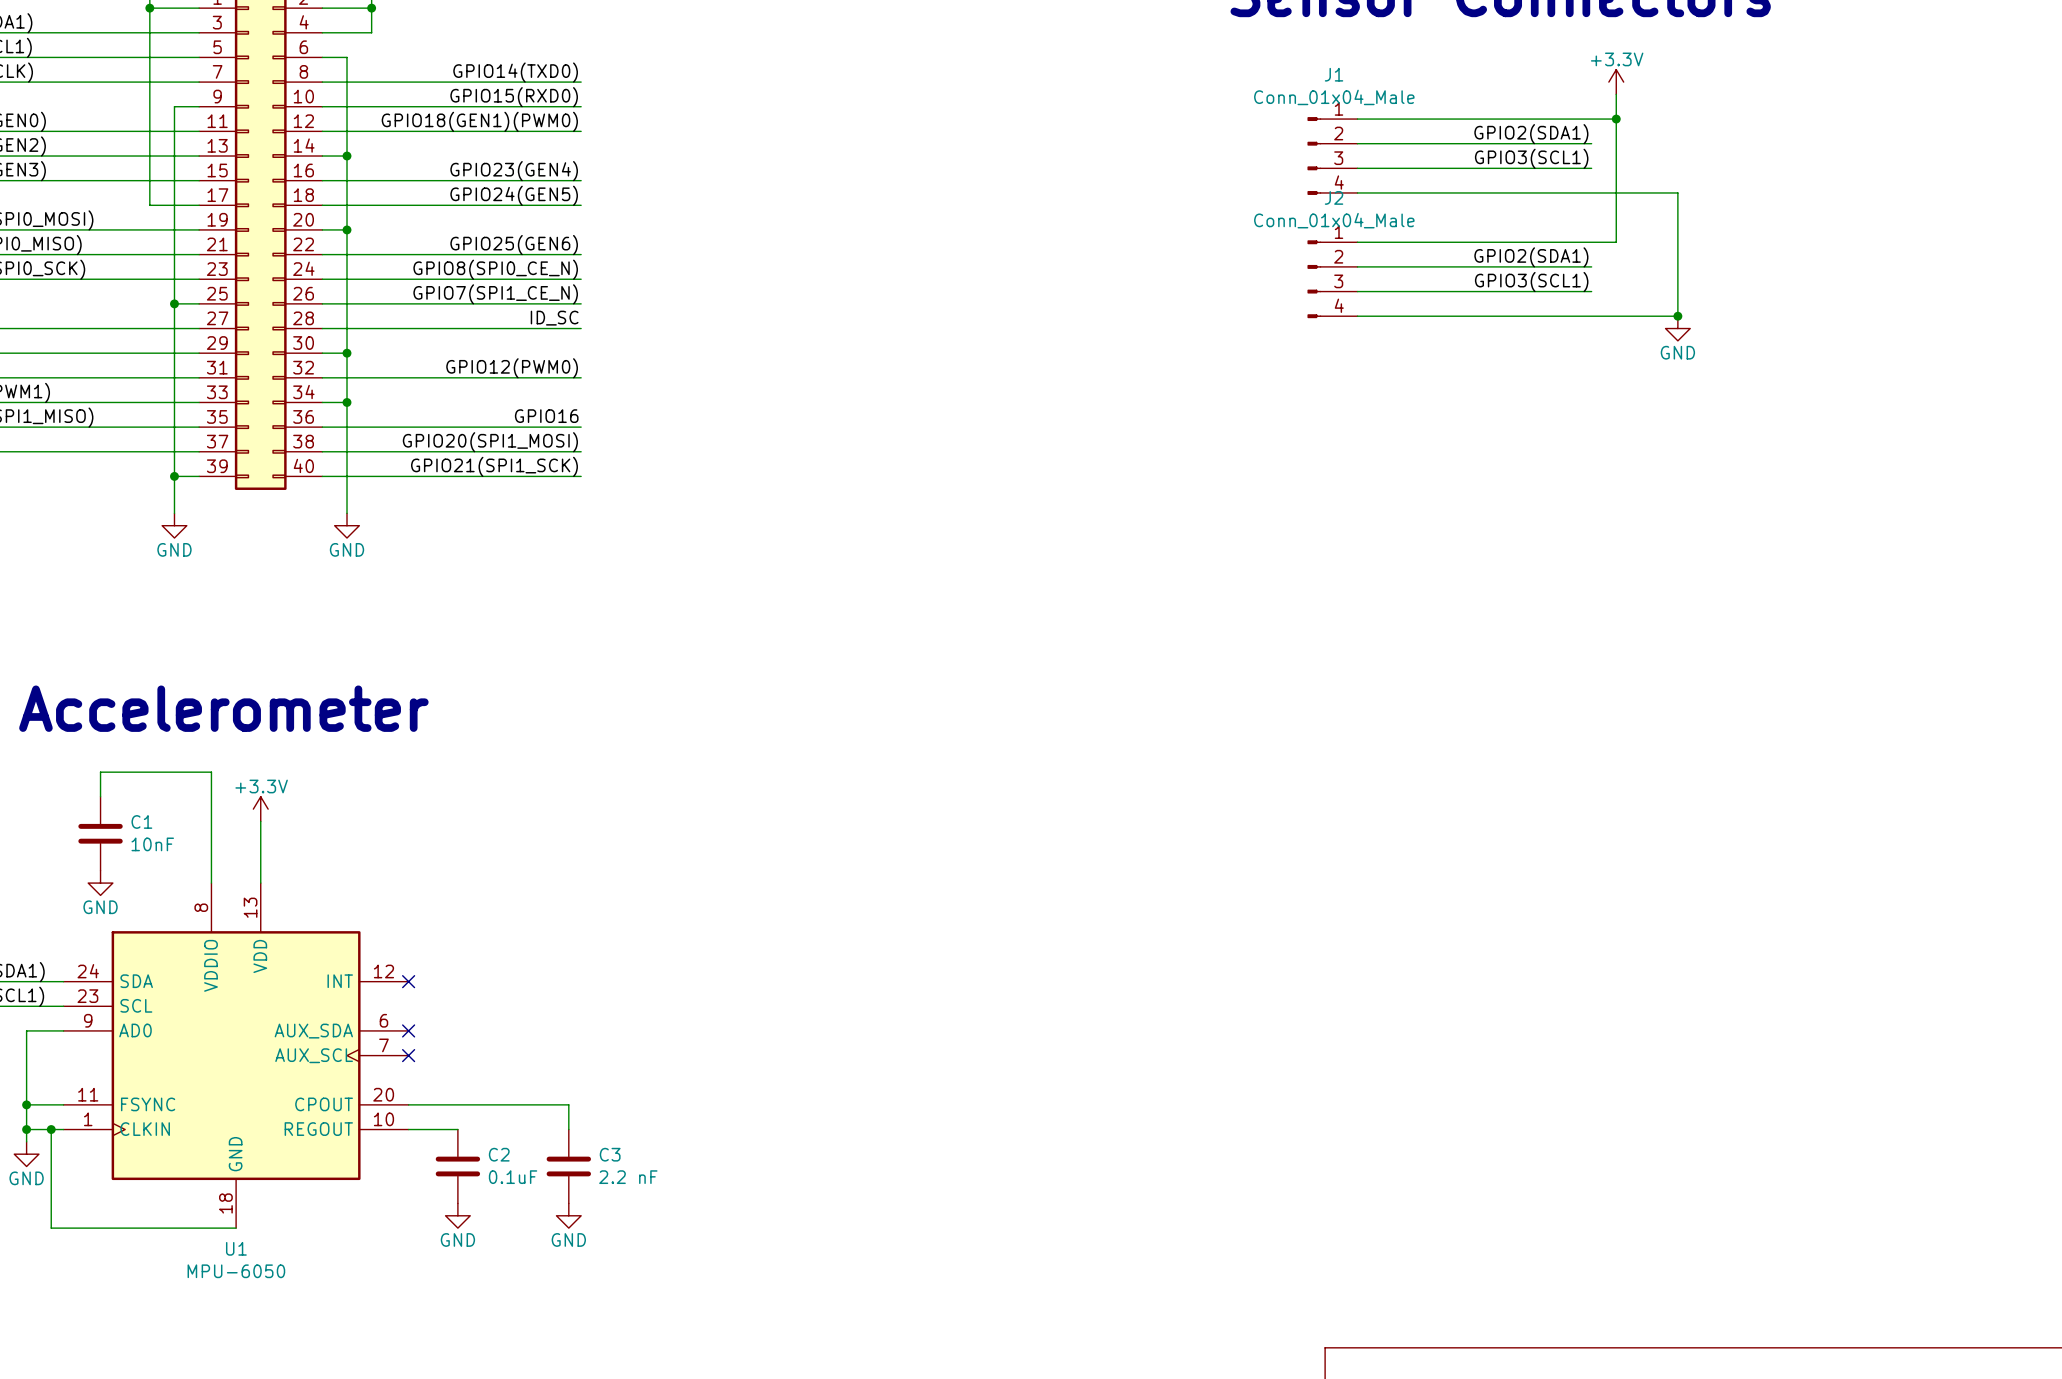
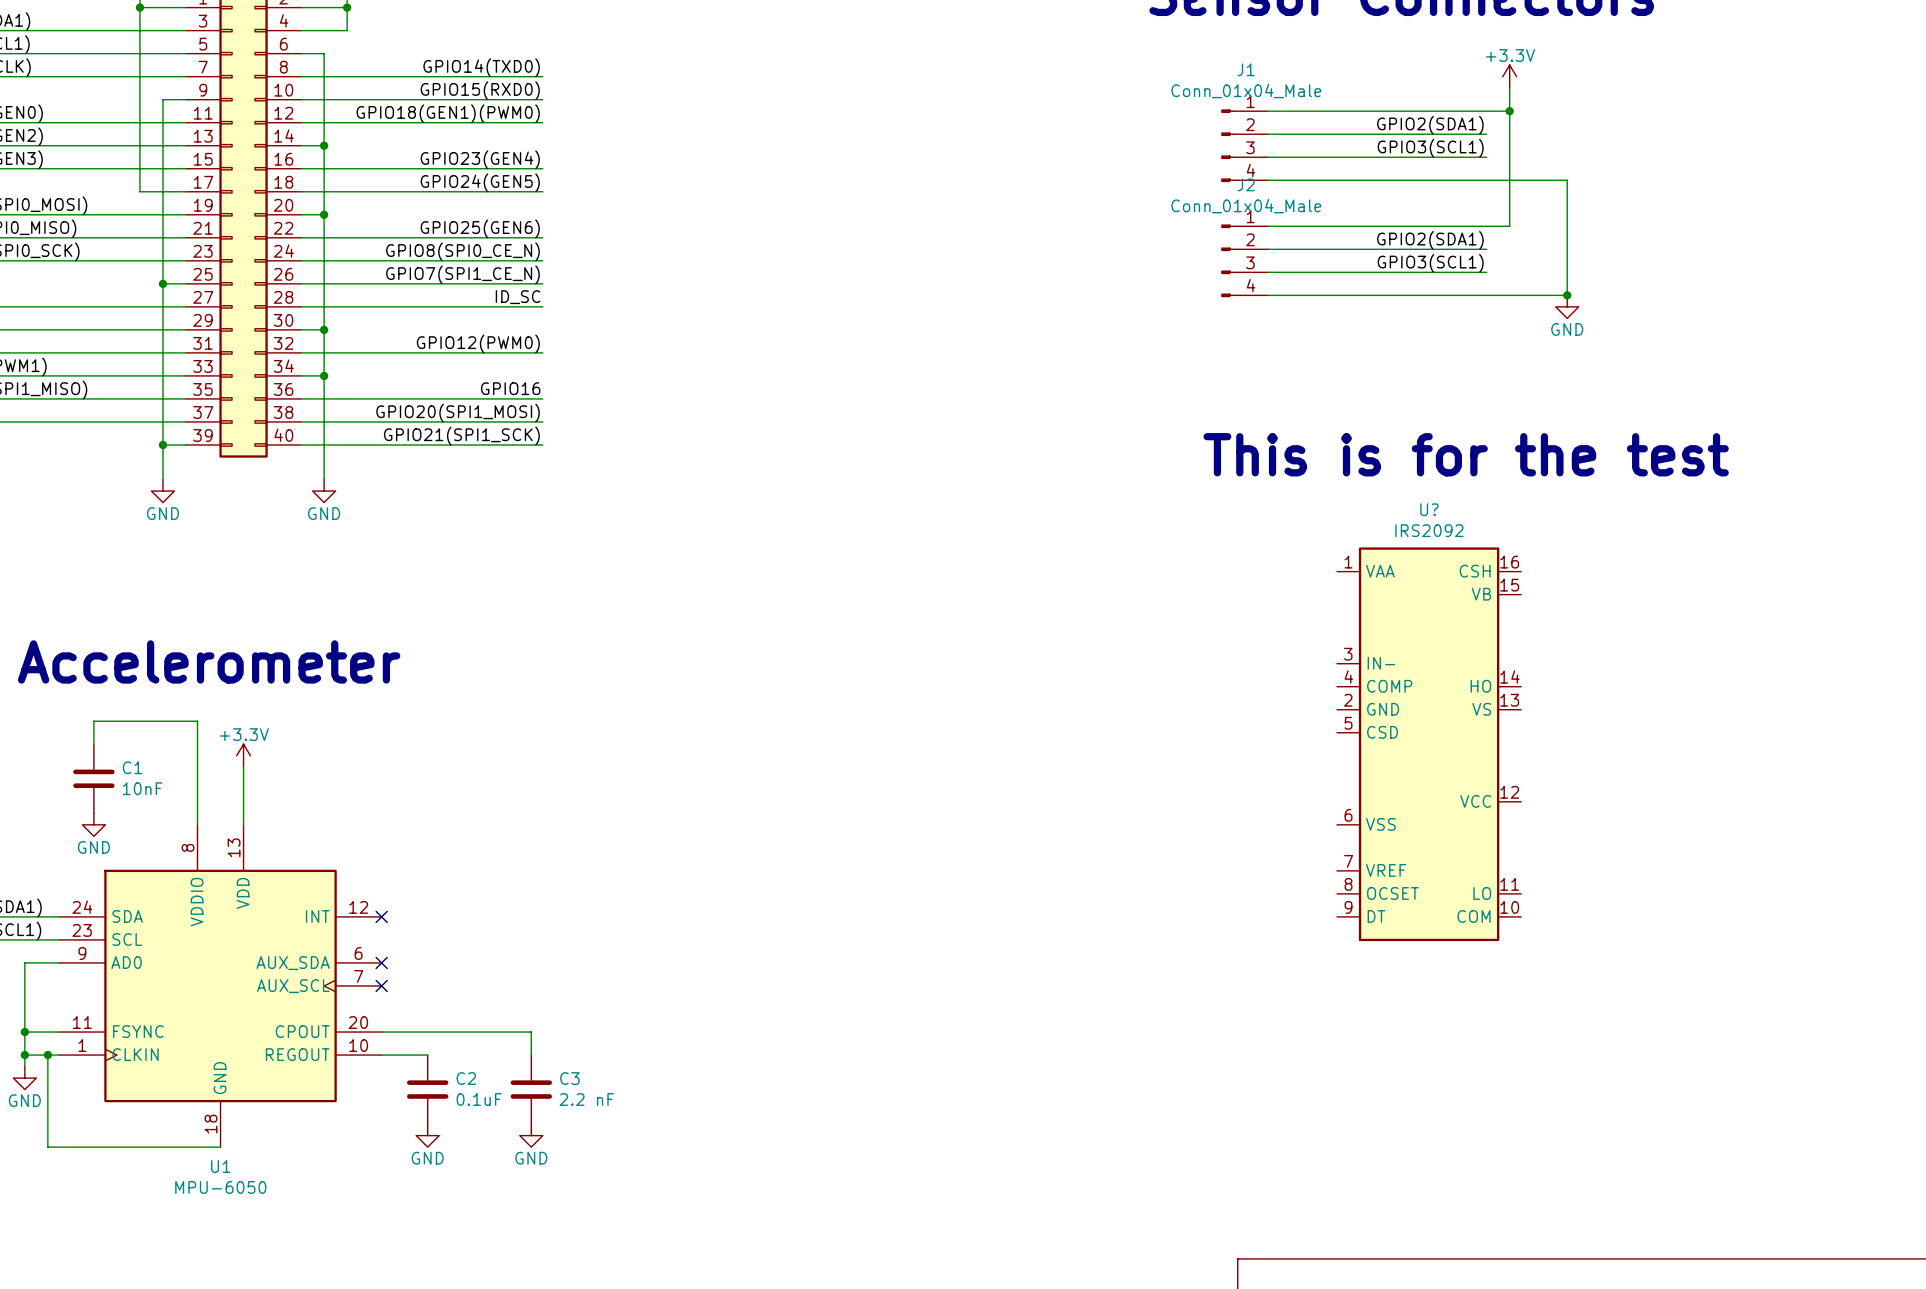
text: none -> This is for the test (1466, 454)
U?: none -> IRS2092 (1429, 744)

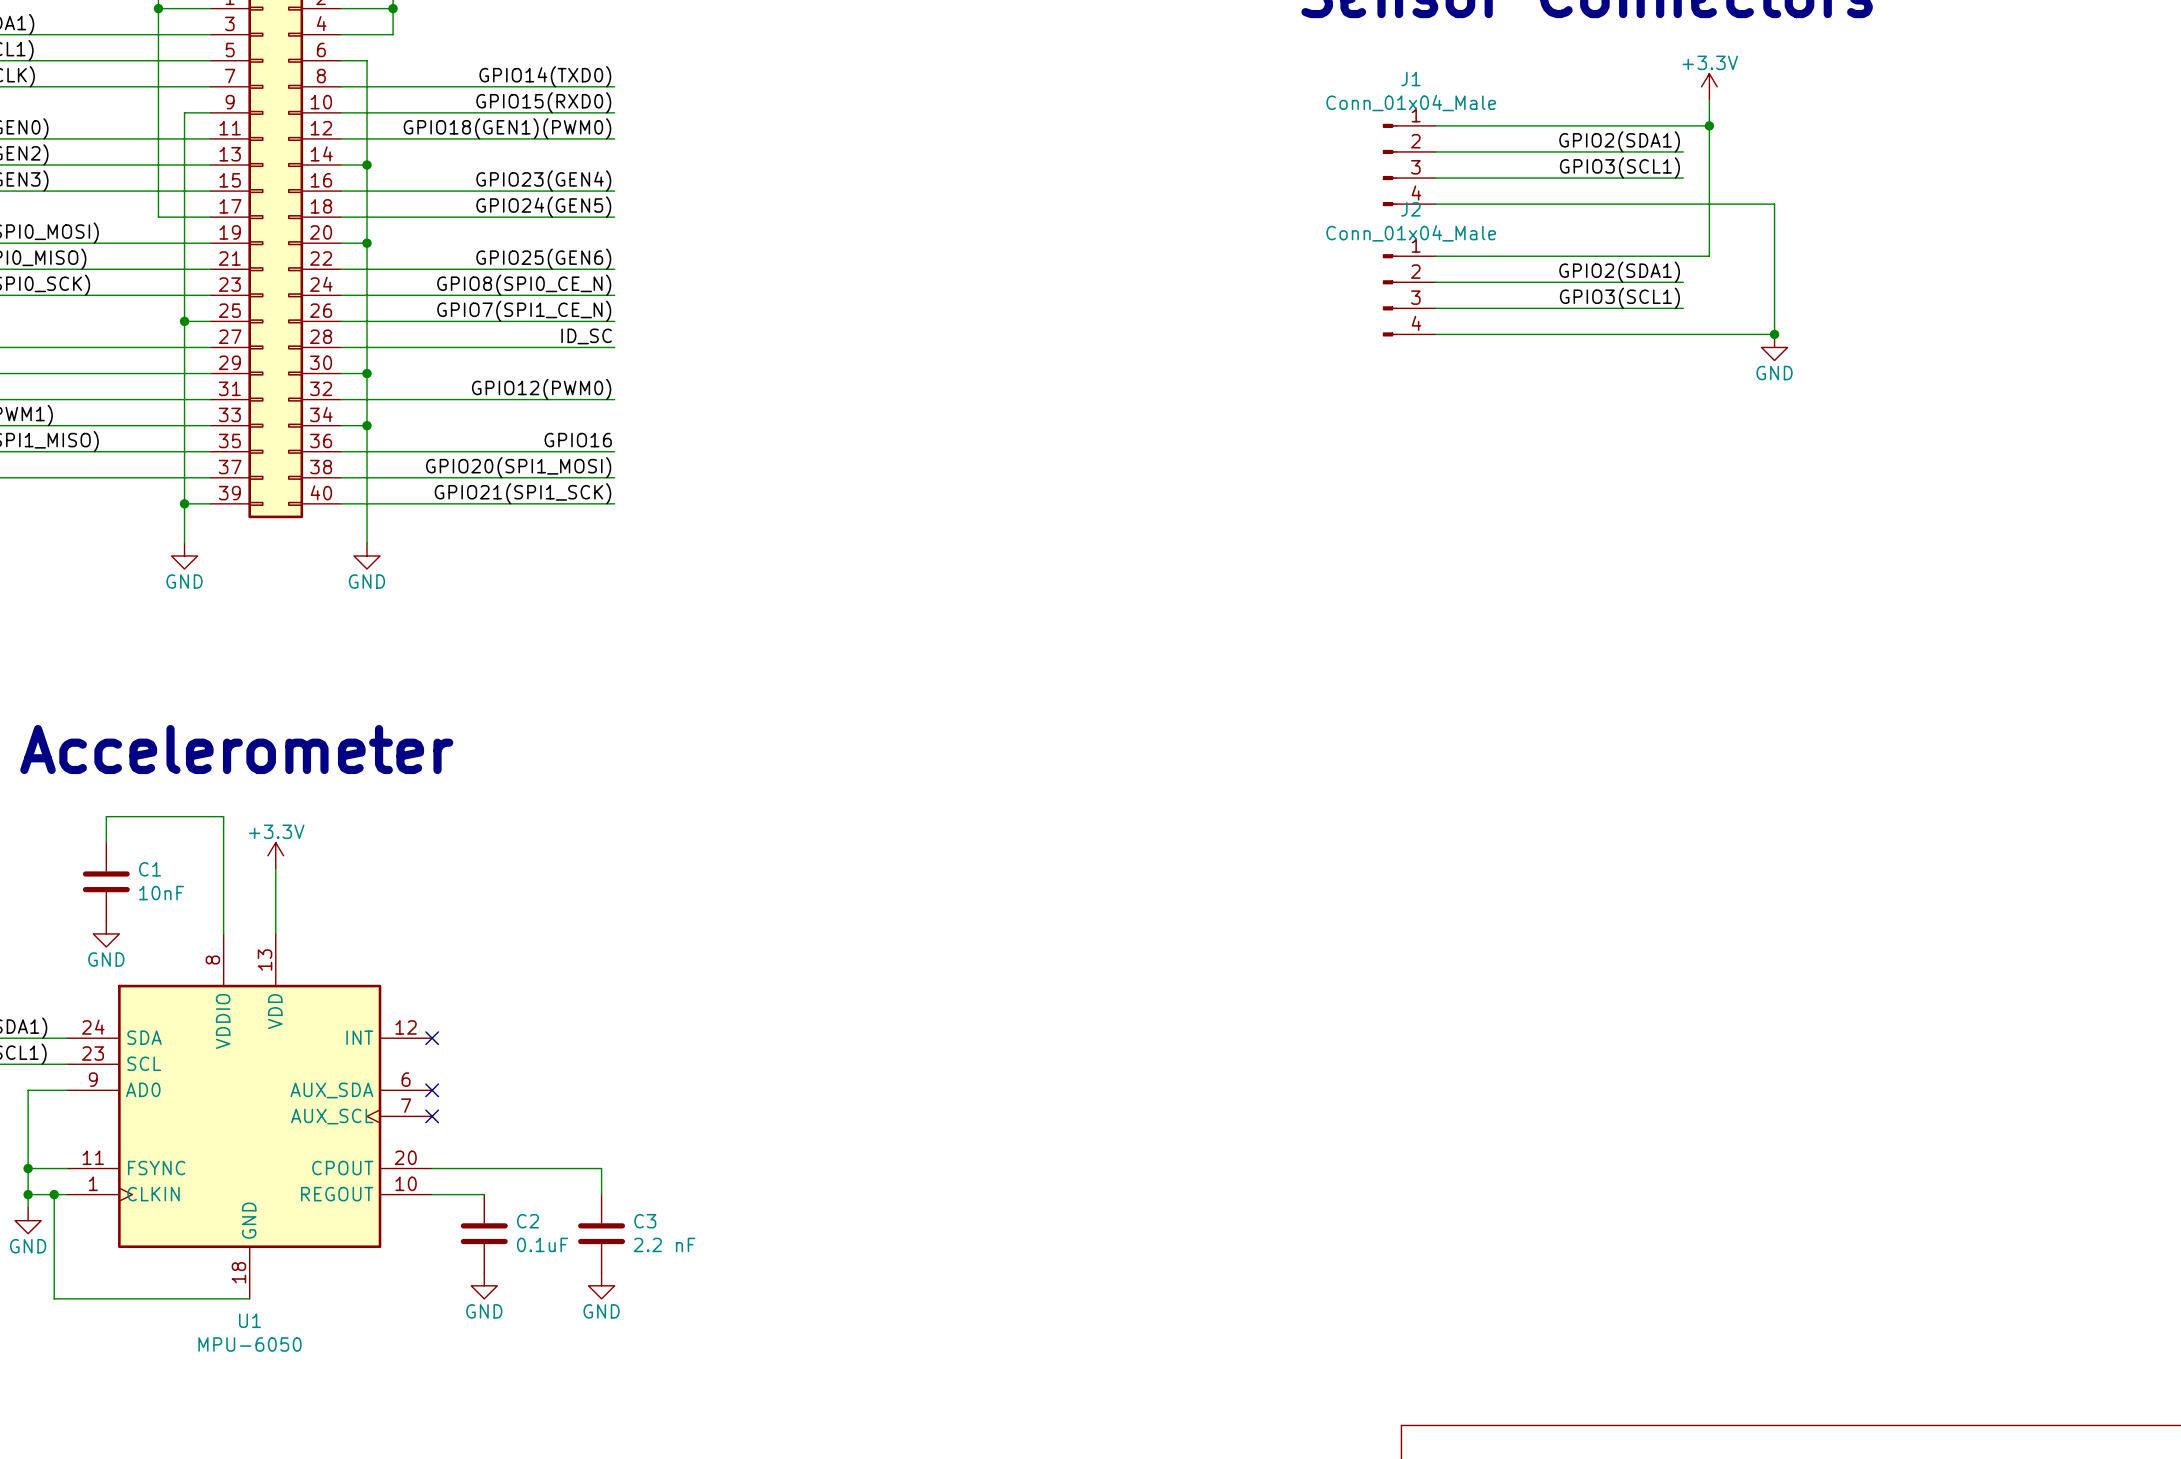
text: This is for the test (1466, 454) -> none
U?: IRS2092 (1429, 744) -> none

